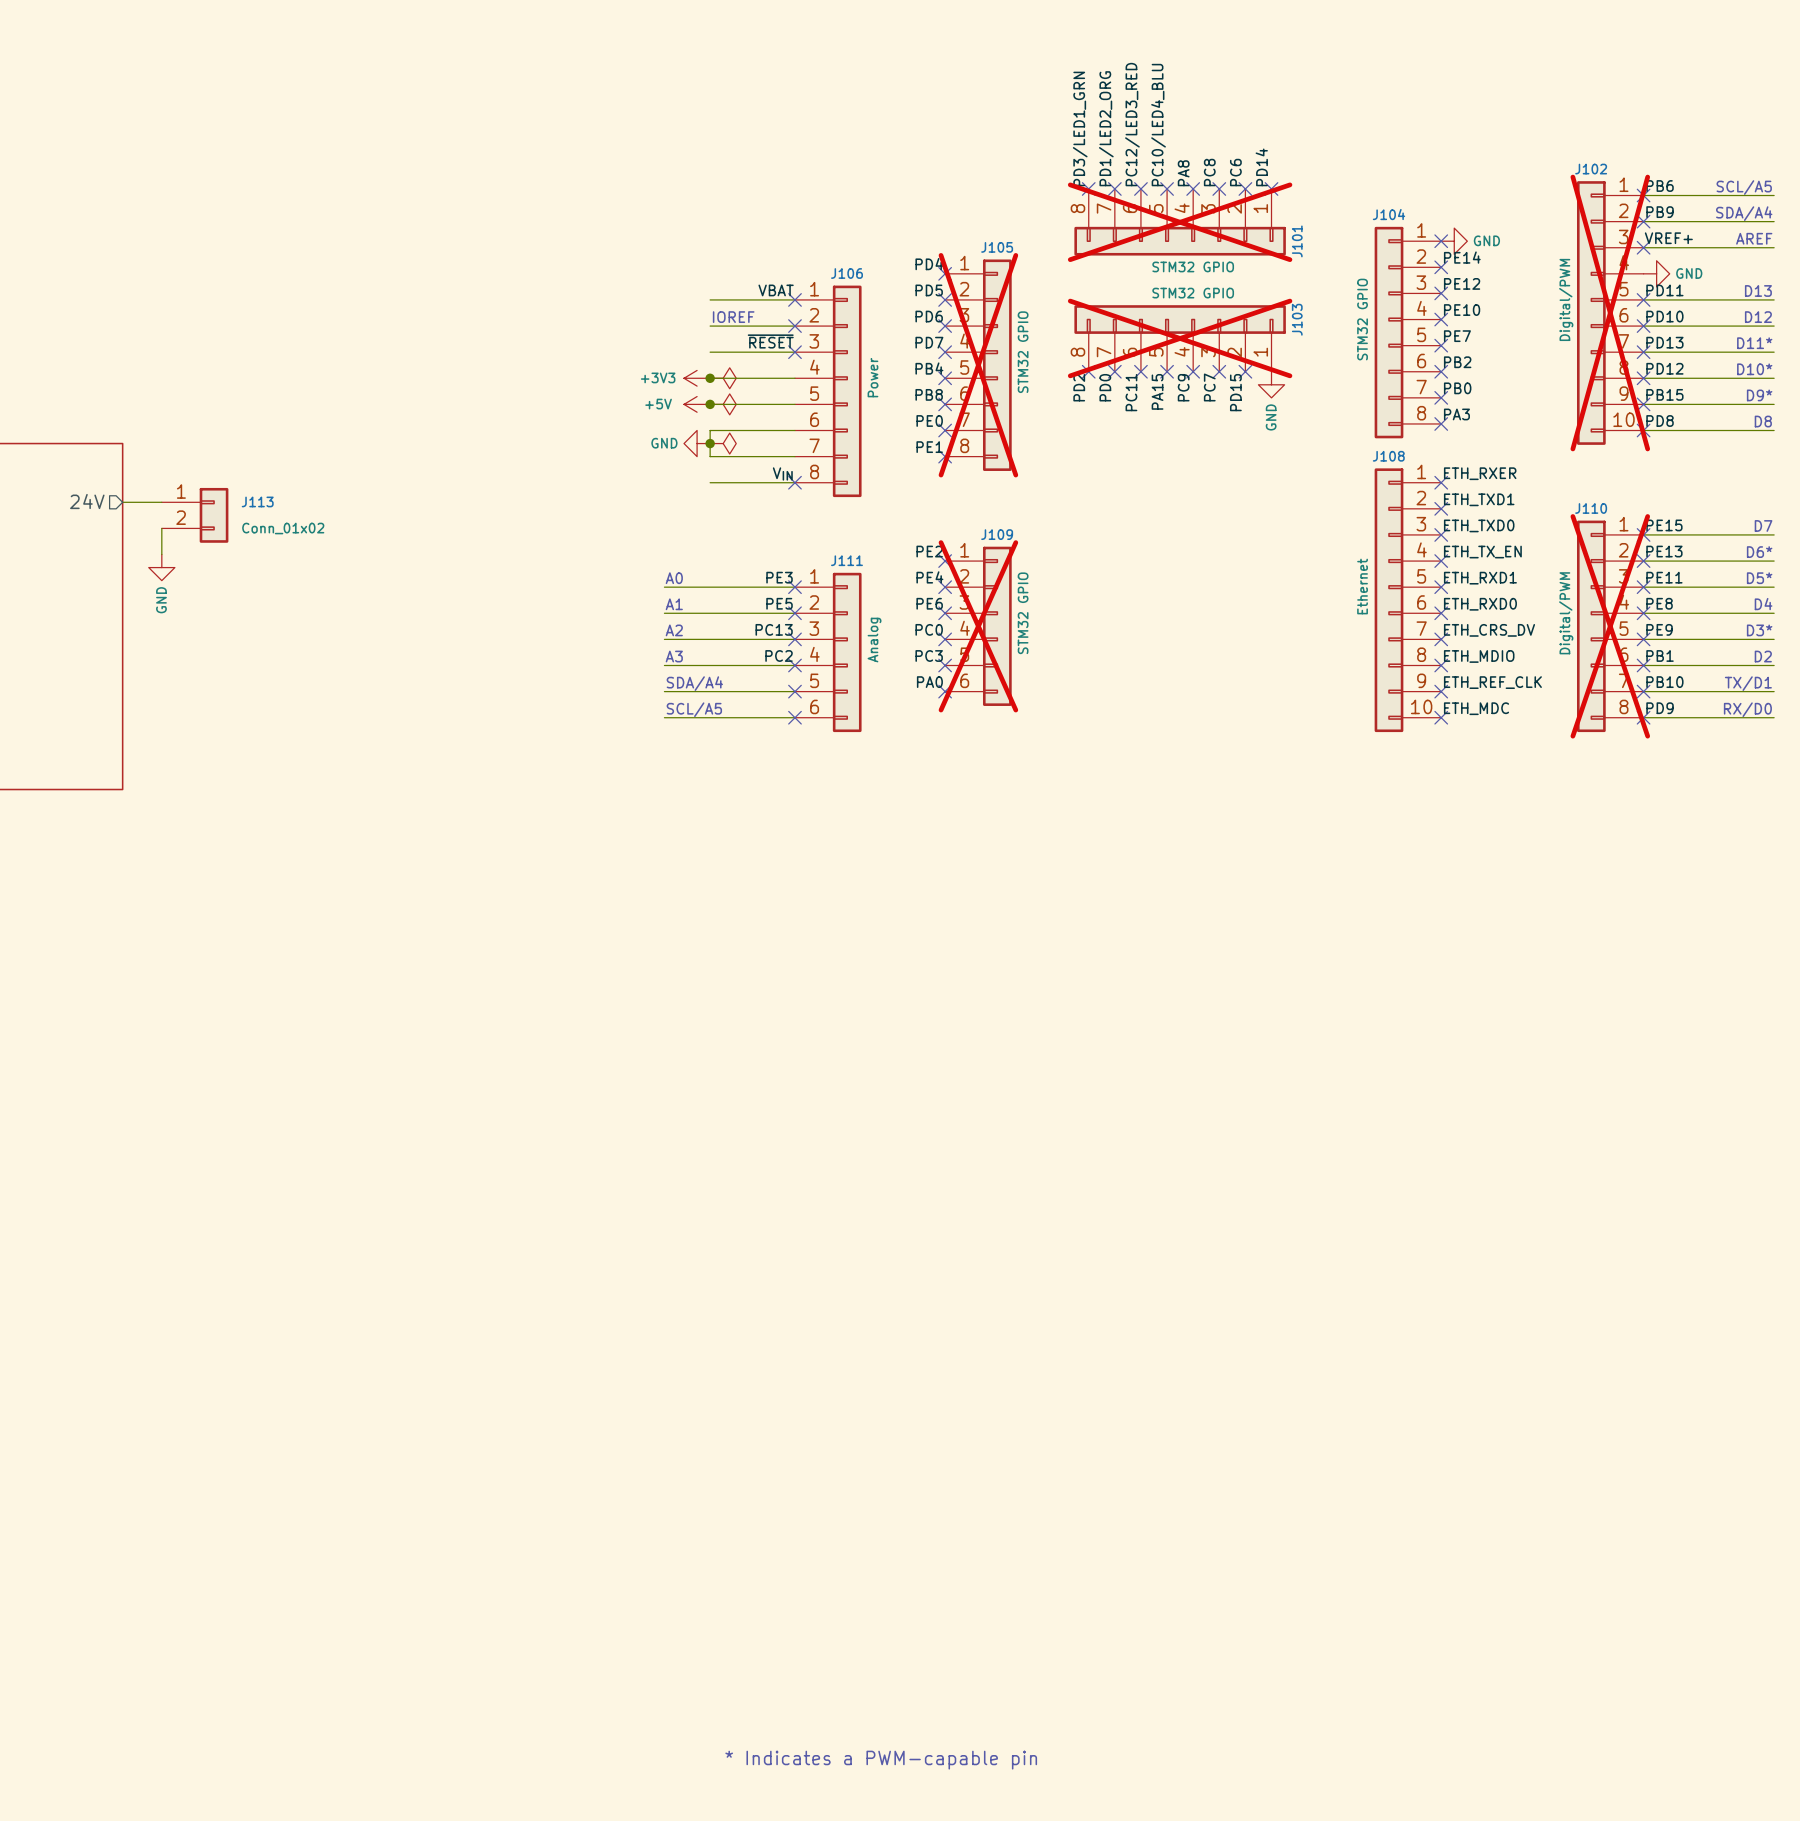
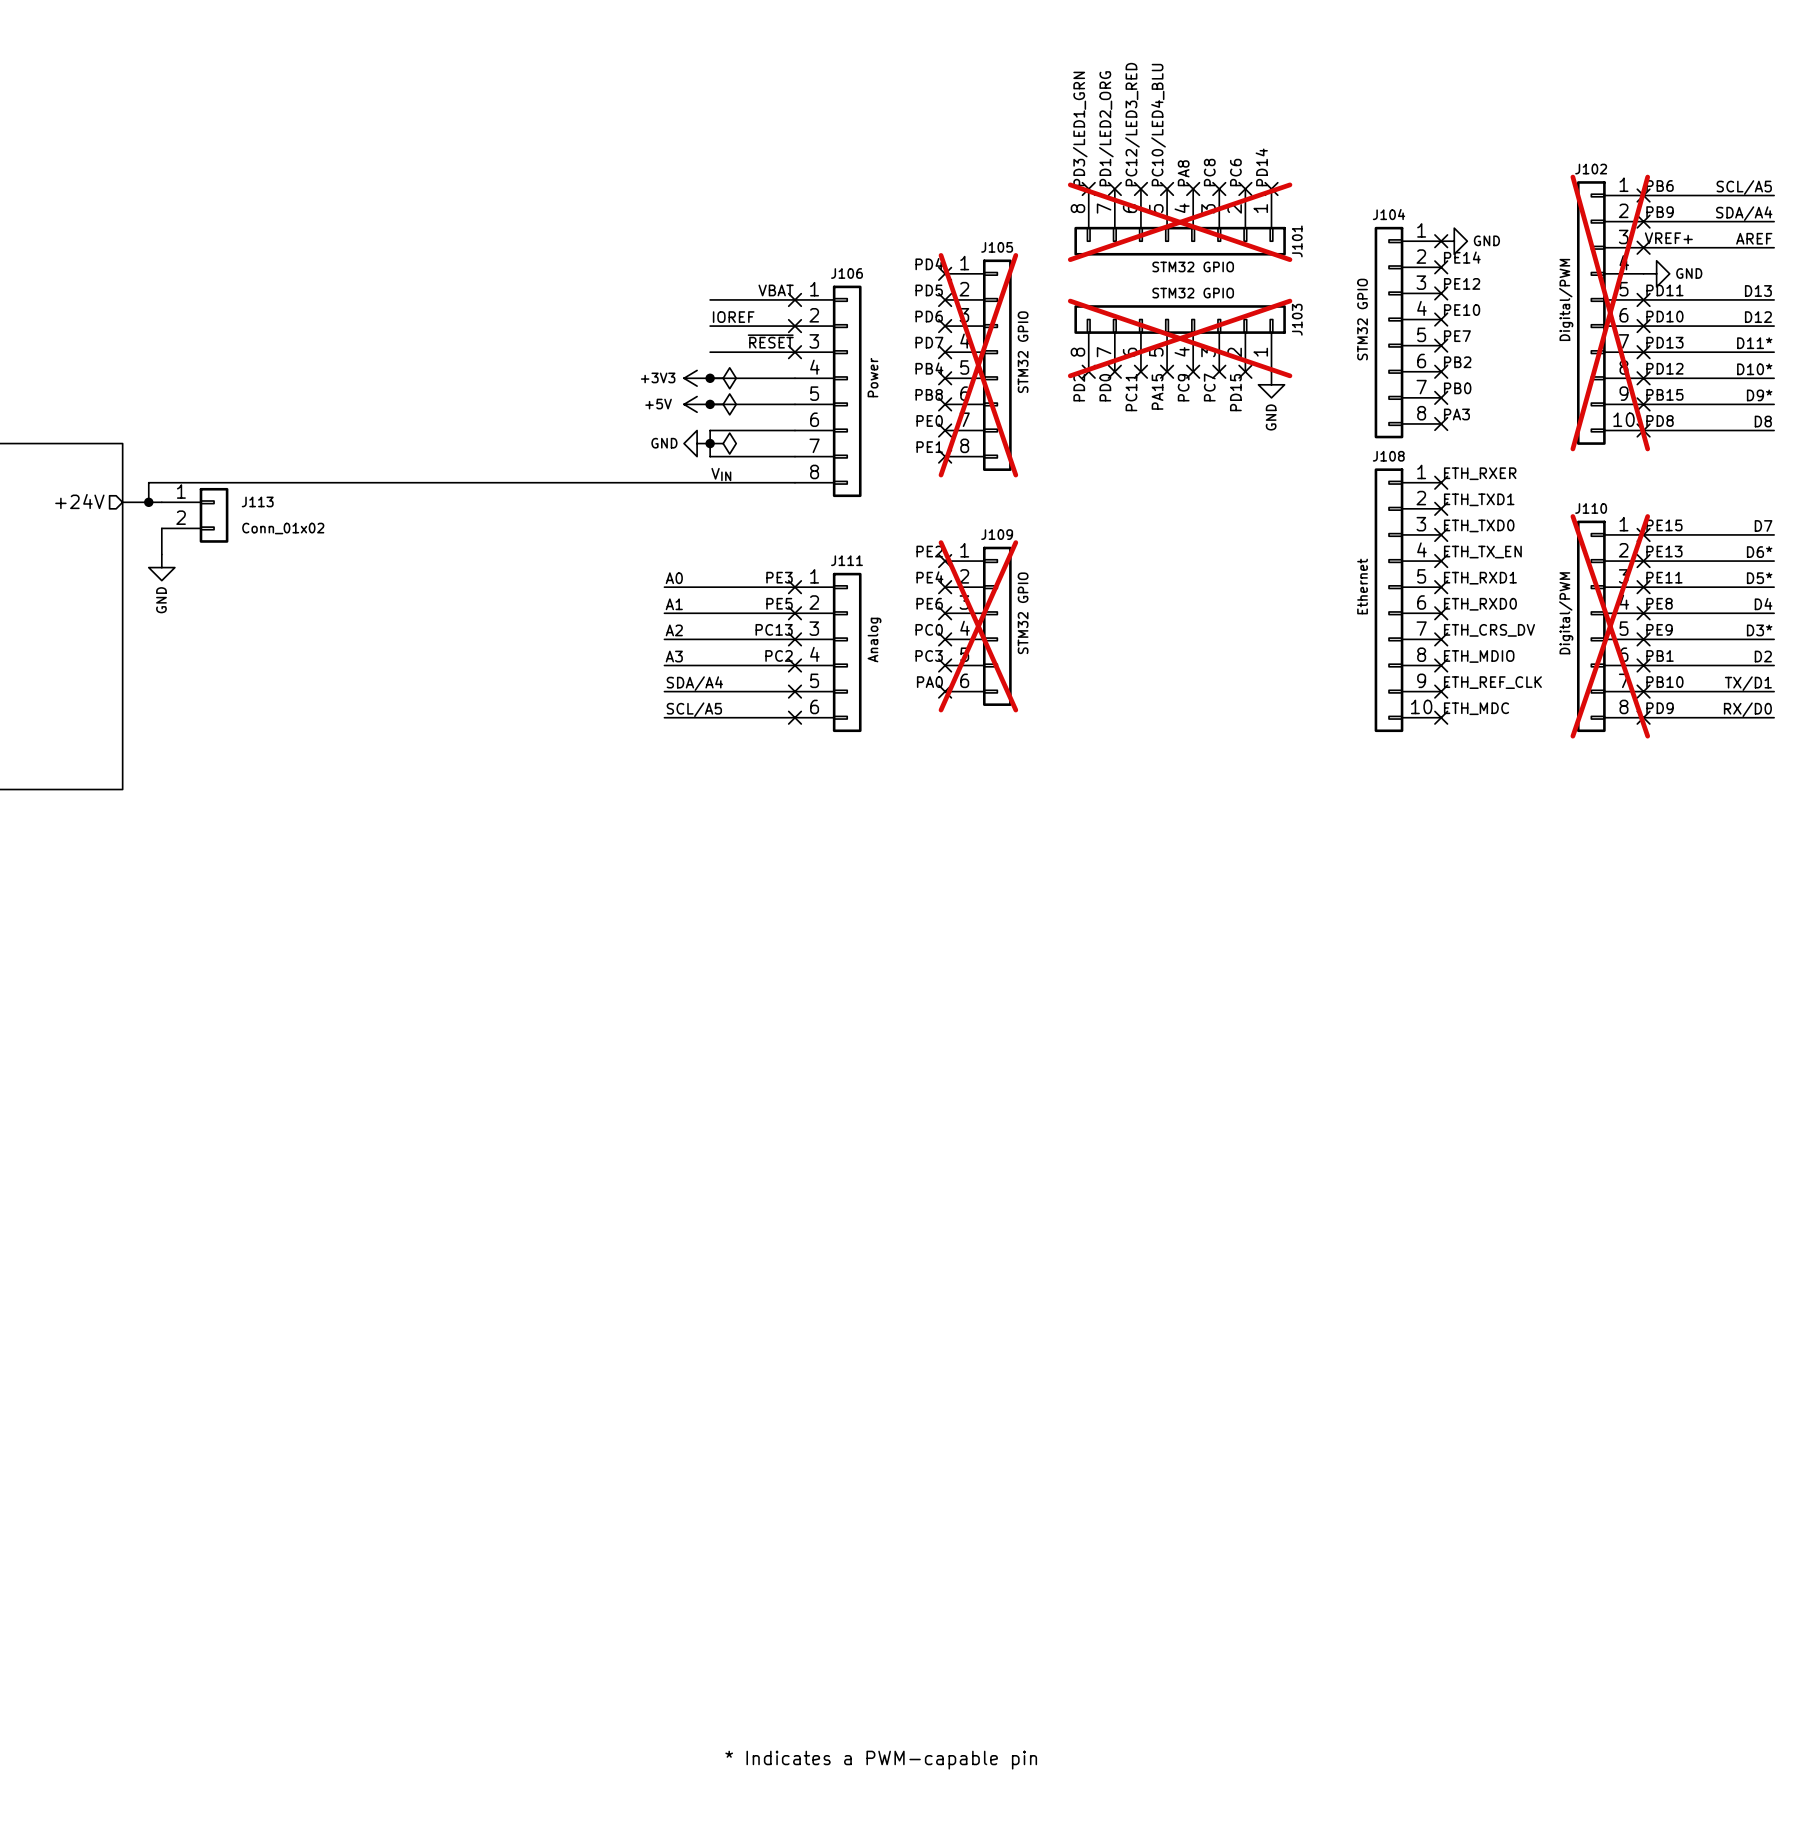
label: VIN (782, 473) -> none
text: none -> VIN (721, 474)
wire: none -> (710, 482) (148, 482) (148, 502)
no-connect mark: (794, 482) -> none
sheet pin: 24V (87, 501) -> +24V (79, 501)
junction: none -> (148, 502)

